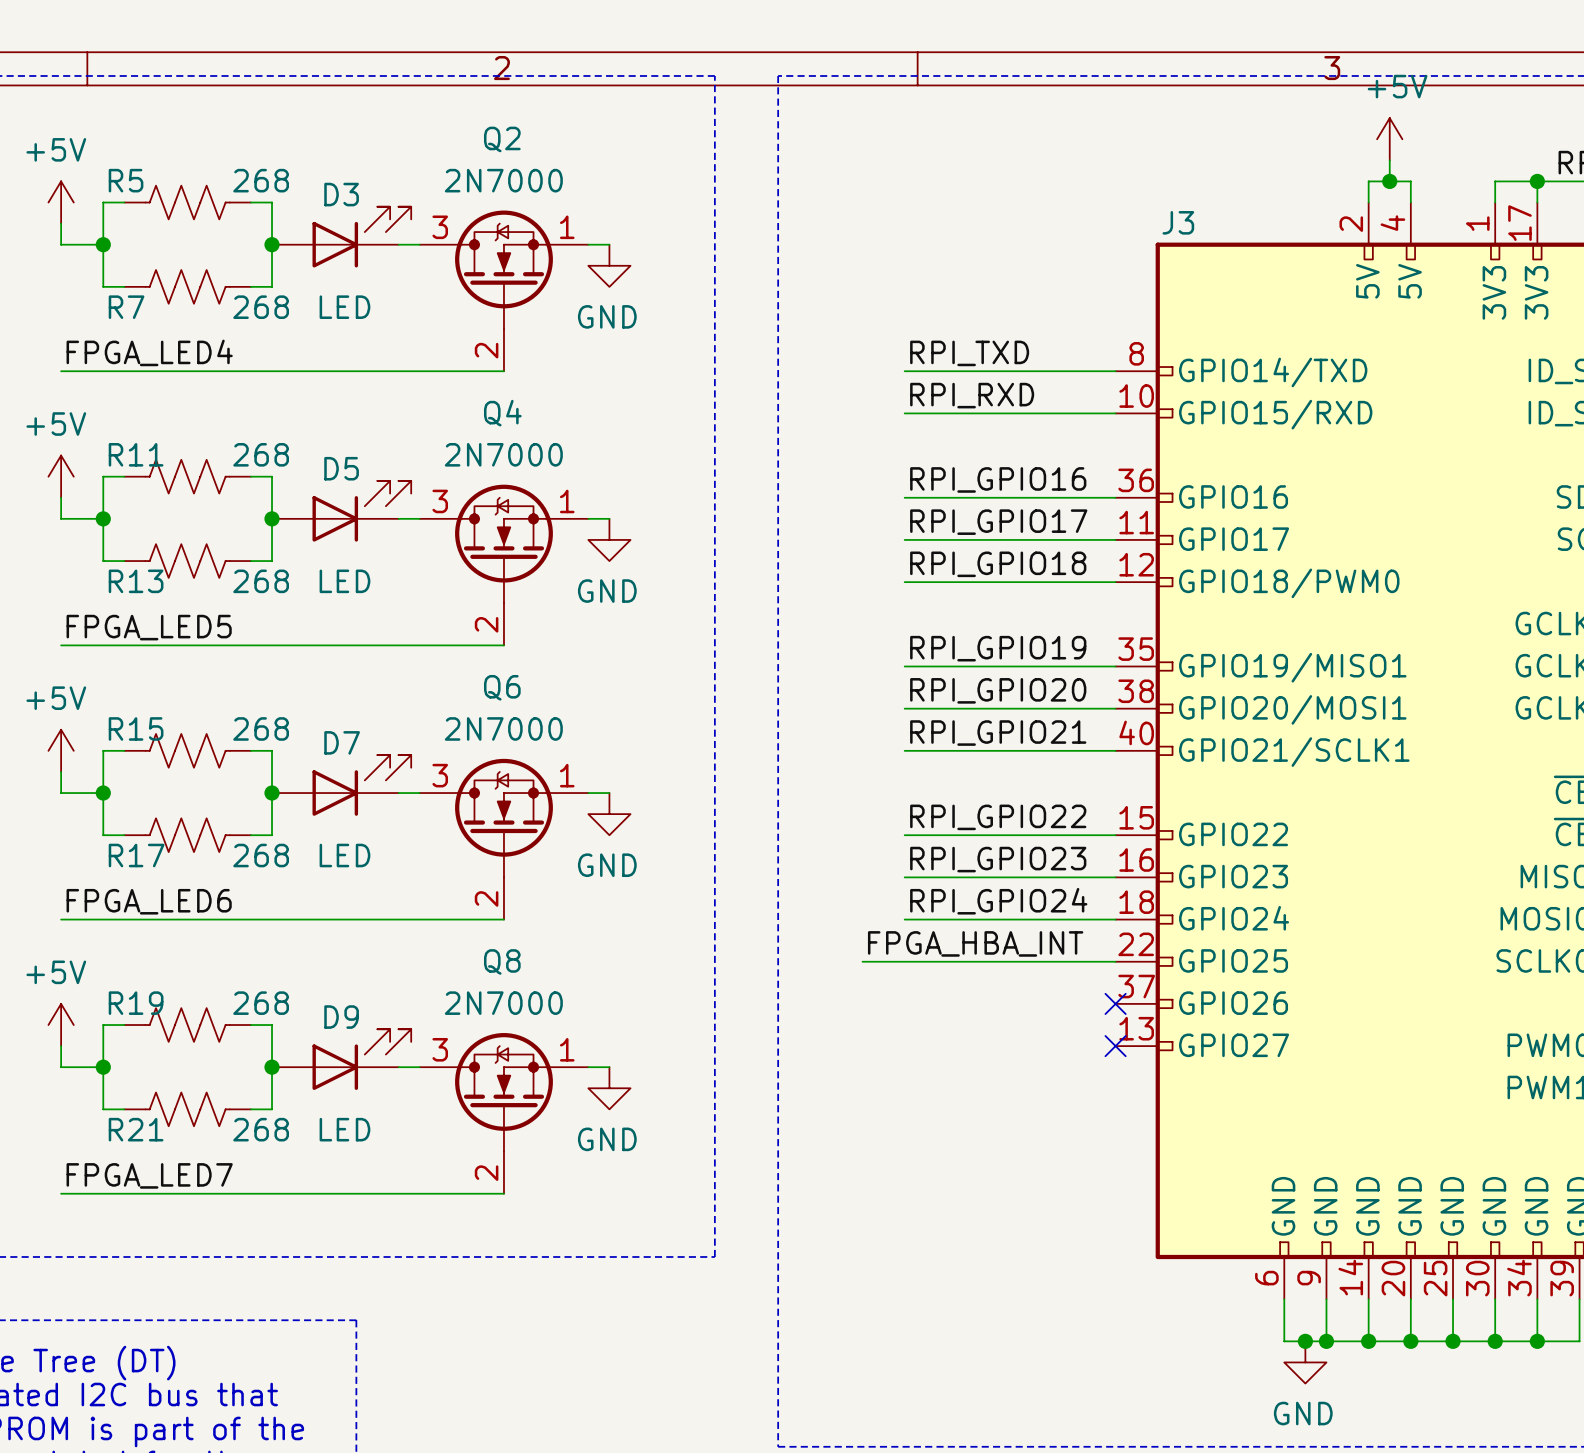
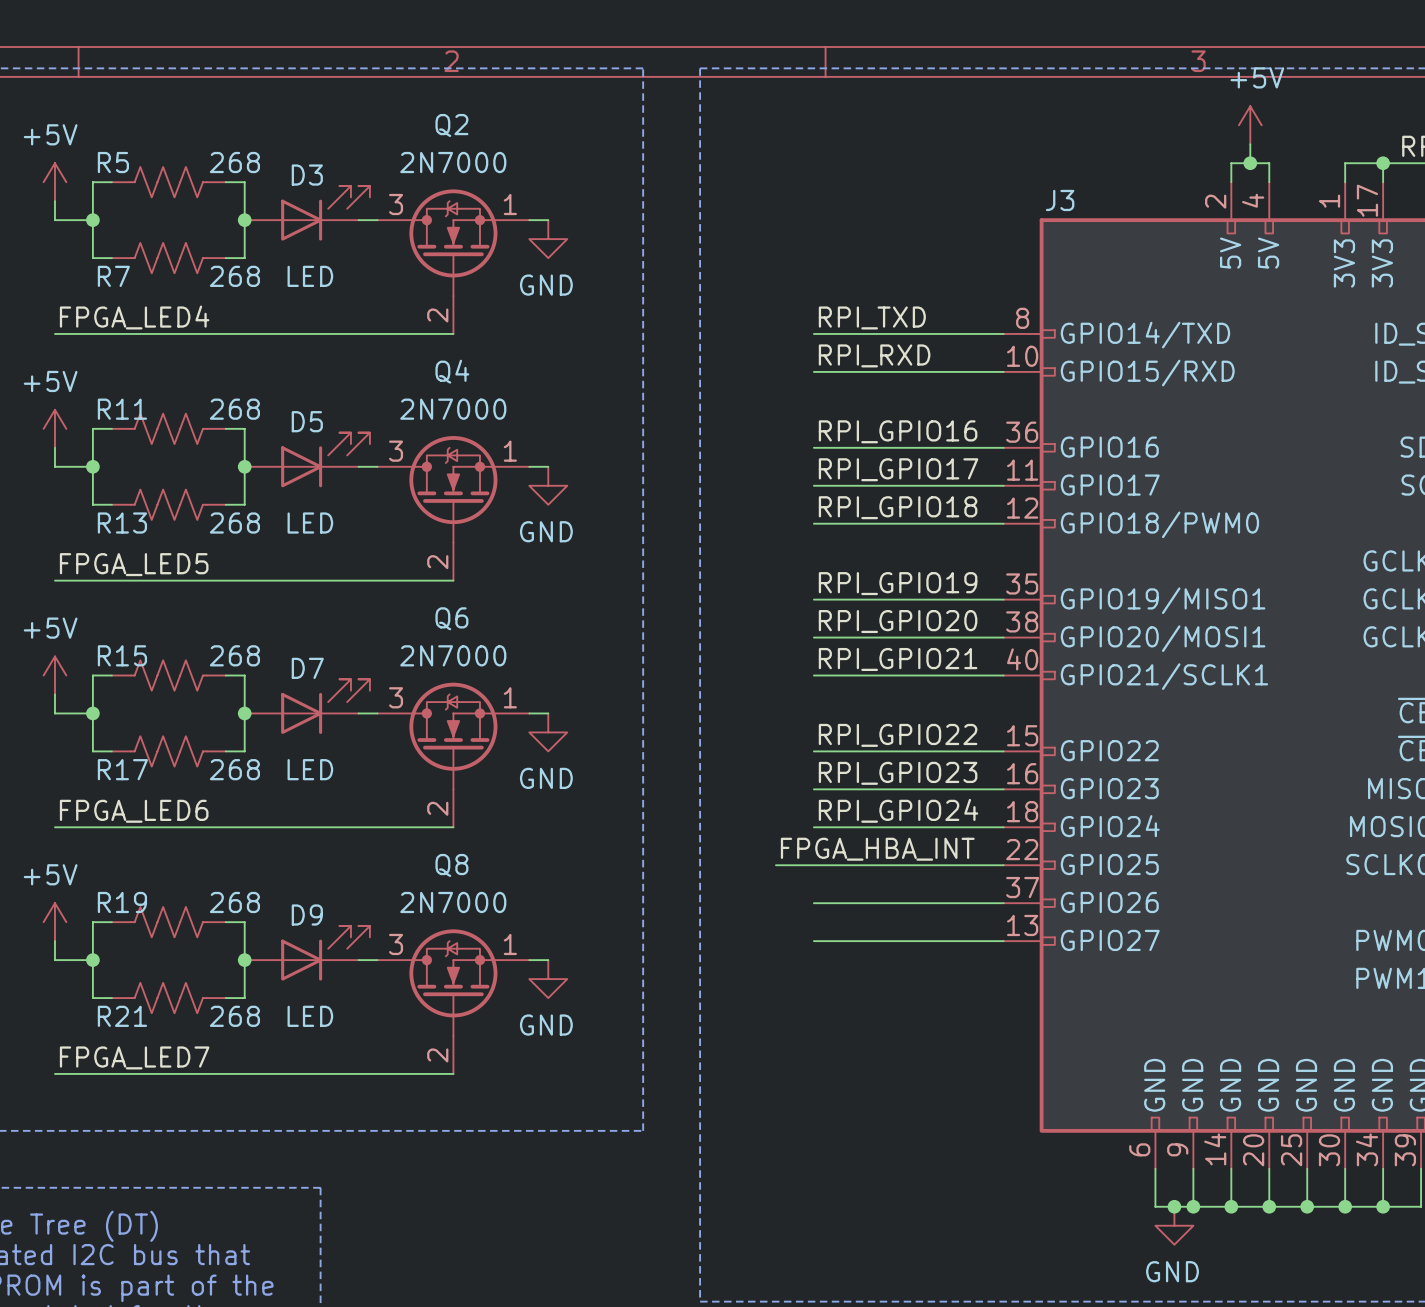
wire: none -> (813, 903) (1003, 903)
no-connect mark: (1115, 1003) -> none
wire: none -> (813, 941) (1003, 941)
no-connect mark: (1115, 1046) -> none

